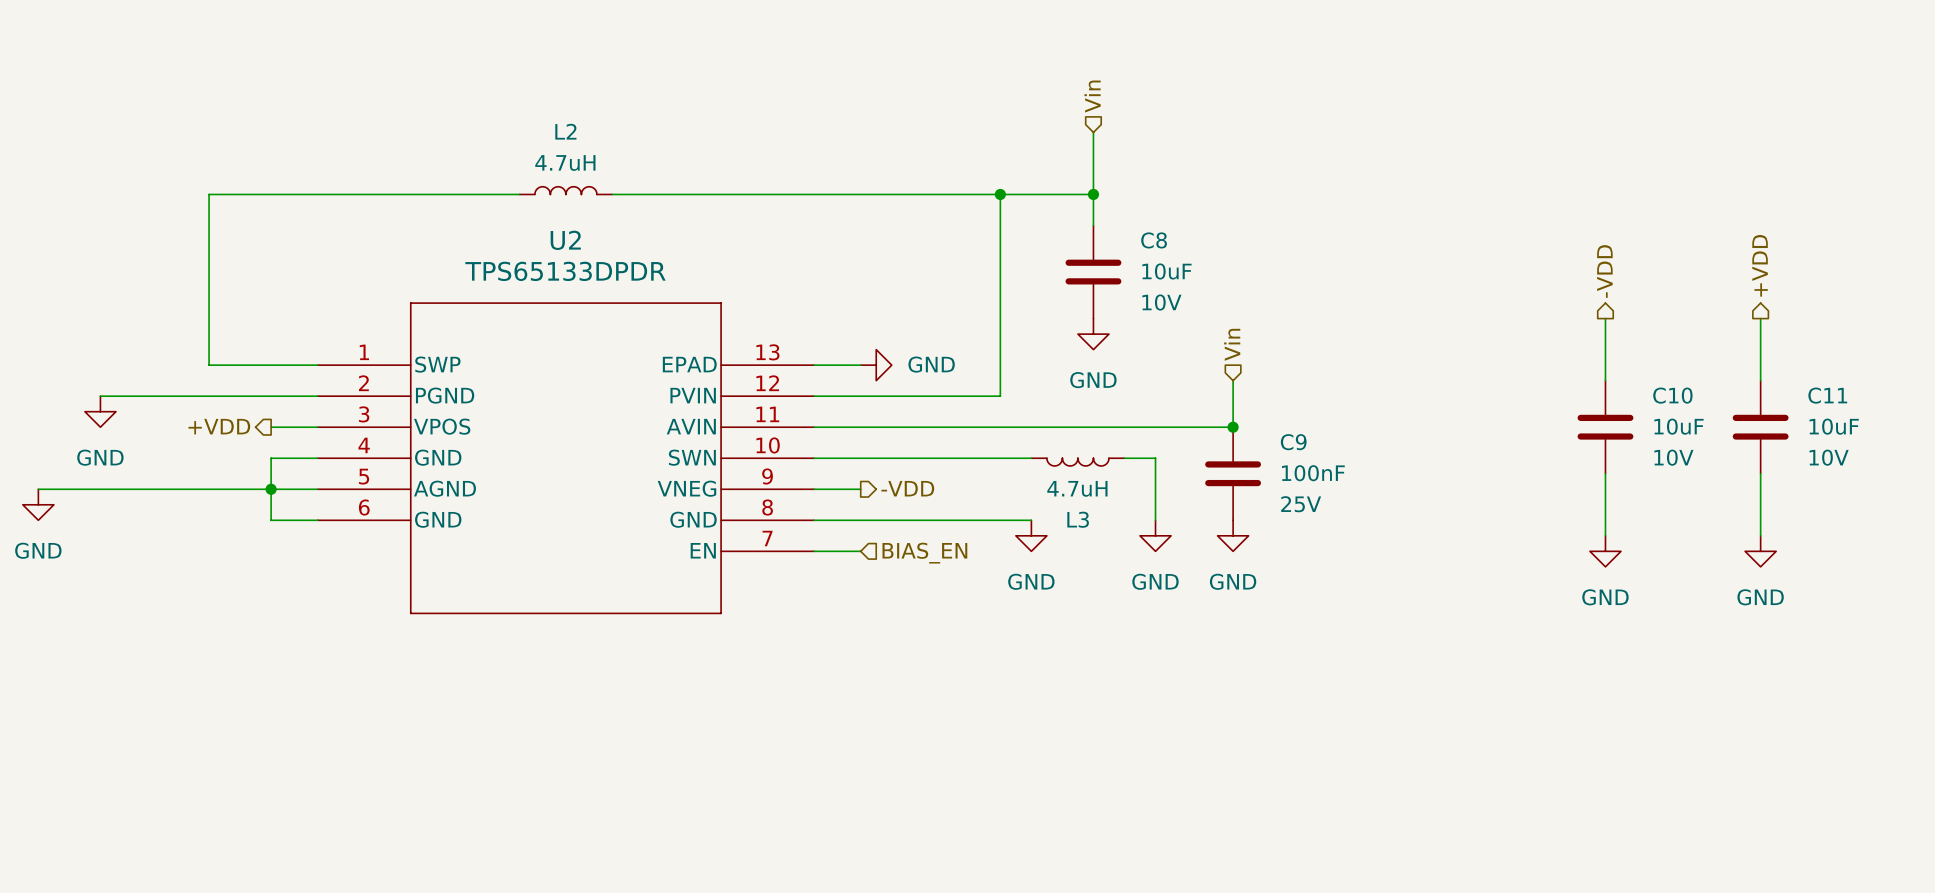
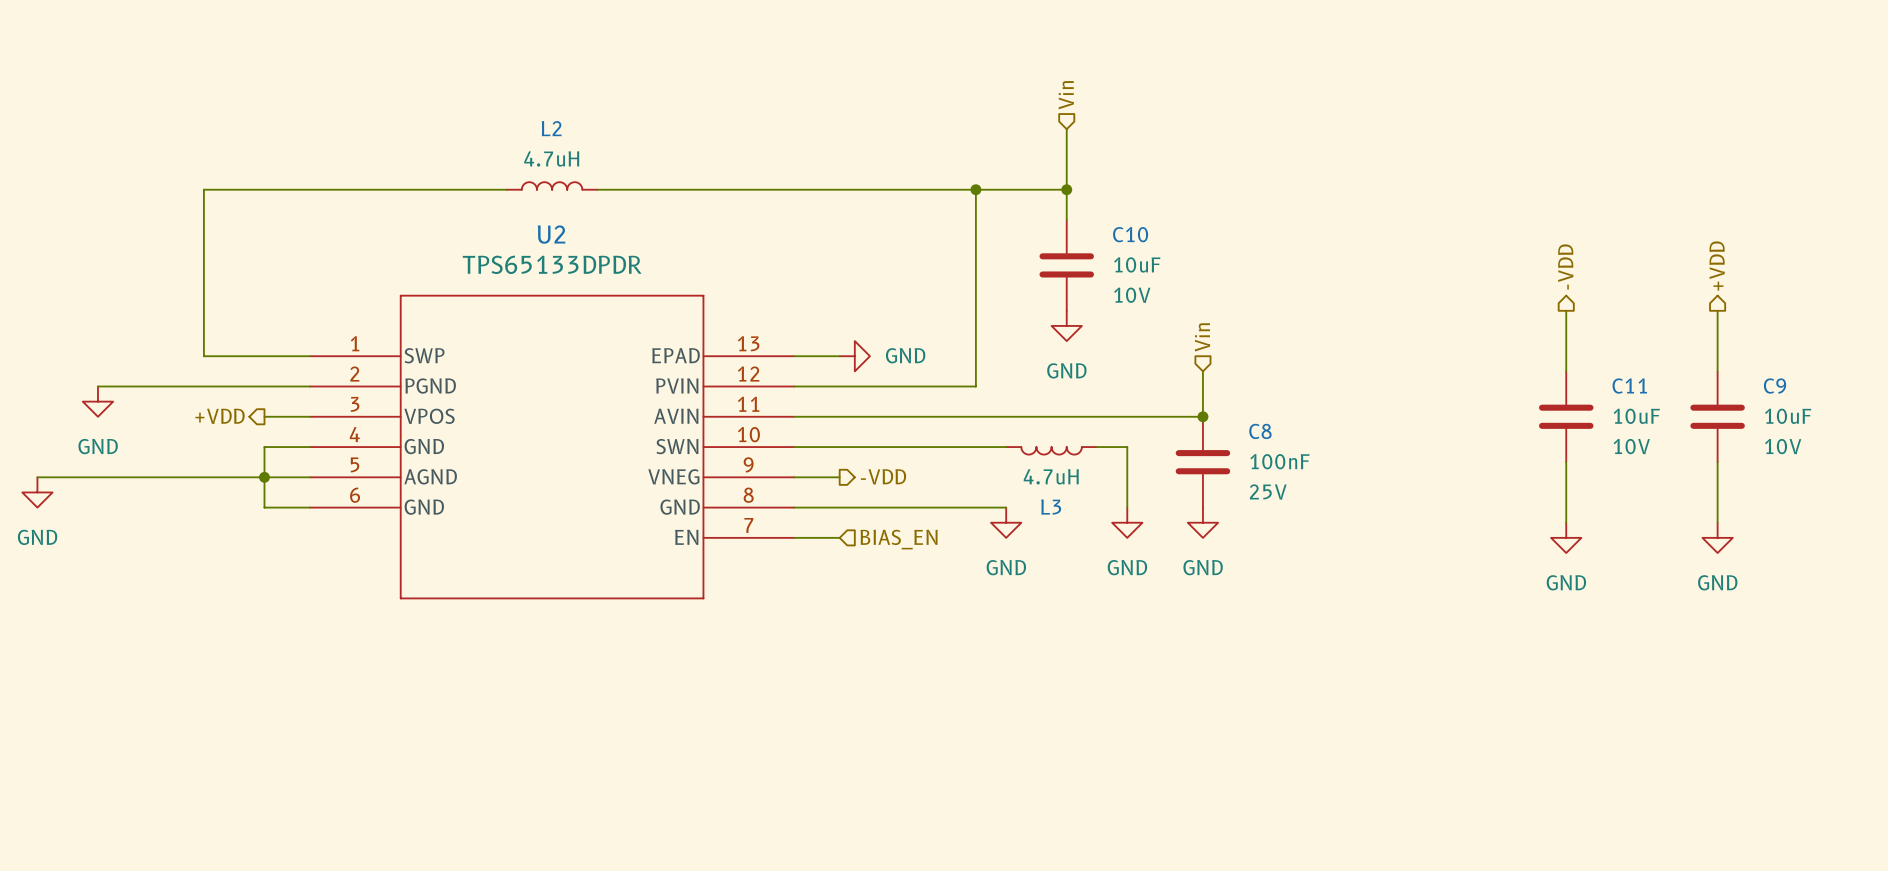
C8 name: C8 (1154, 240) -> C10 (1130, 234)
C10 name: C10 (1672, 395) -> C11 (1629, 386)
C11 name: C11 (1827, 395) -> C9 (1775, 386)
C9 name: C9 (1293, 442) -> C8 (1260, 431)

